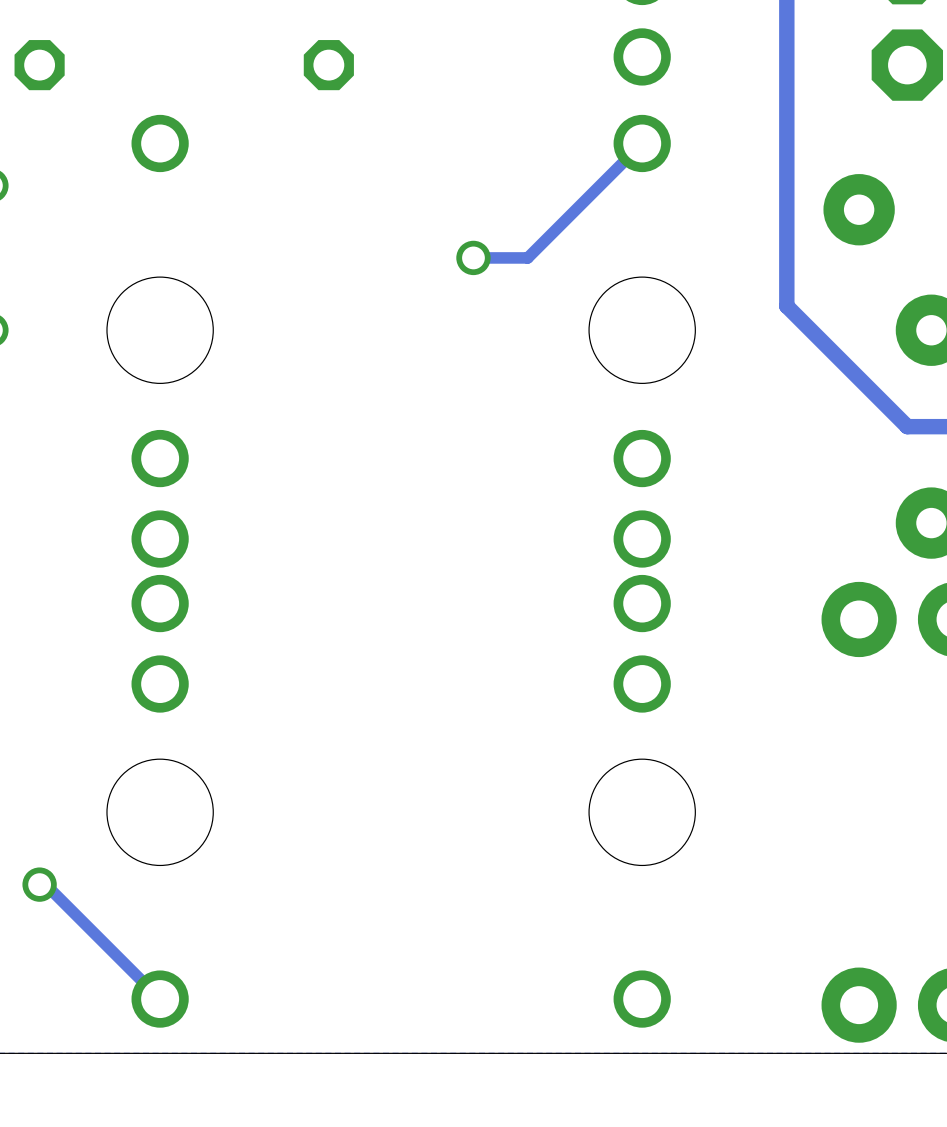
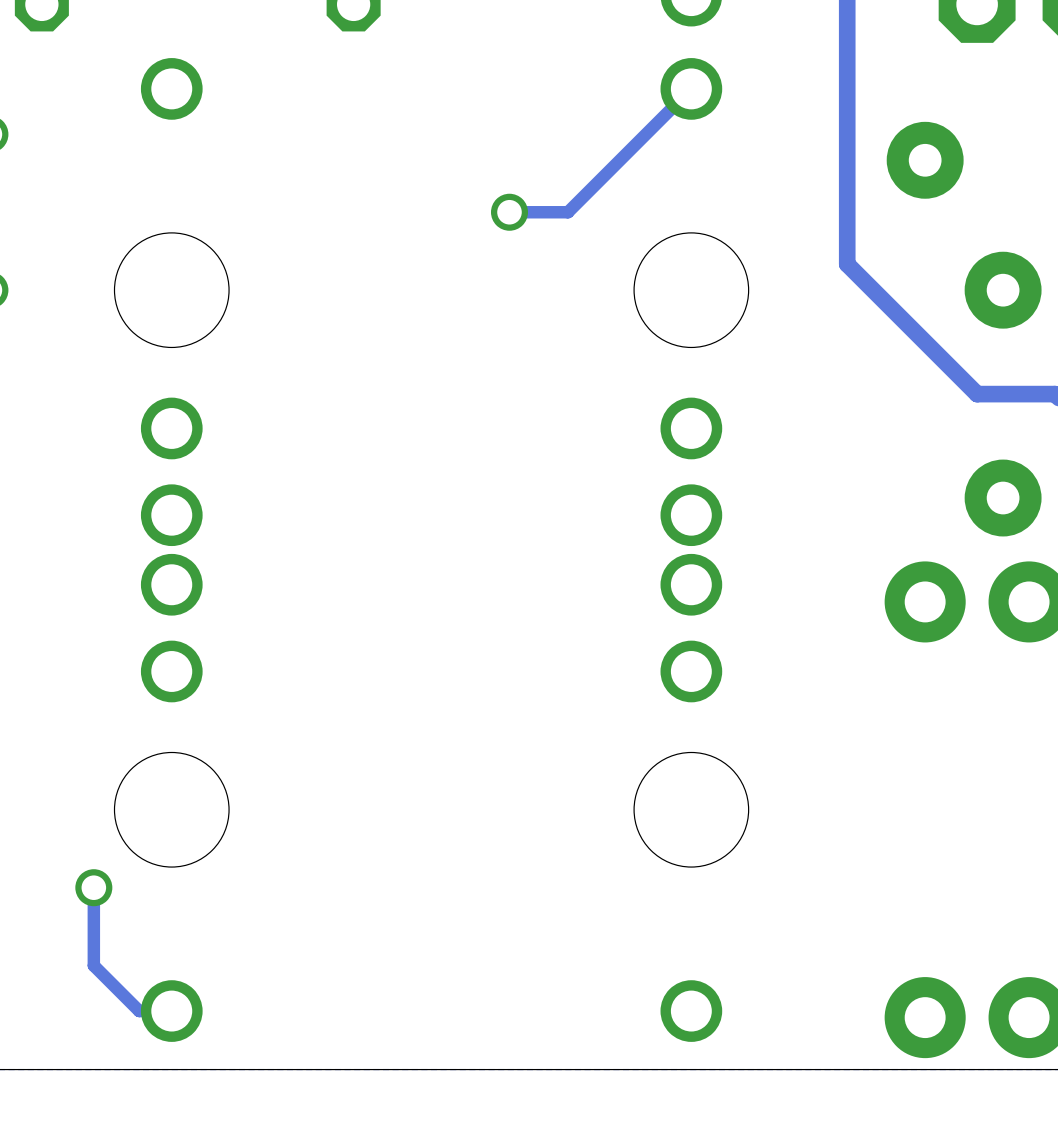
track: (39, 884) (45, 884) (160, 999) -> (93, 887) (93, 965) (139, 1011) (171, 1011)
via position: (39, 884) -> (93, 887)

